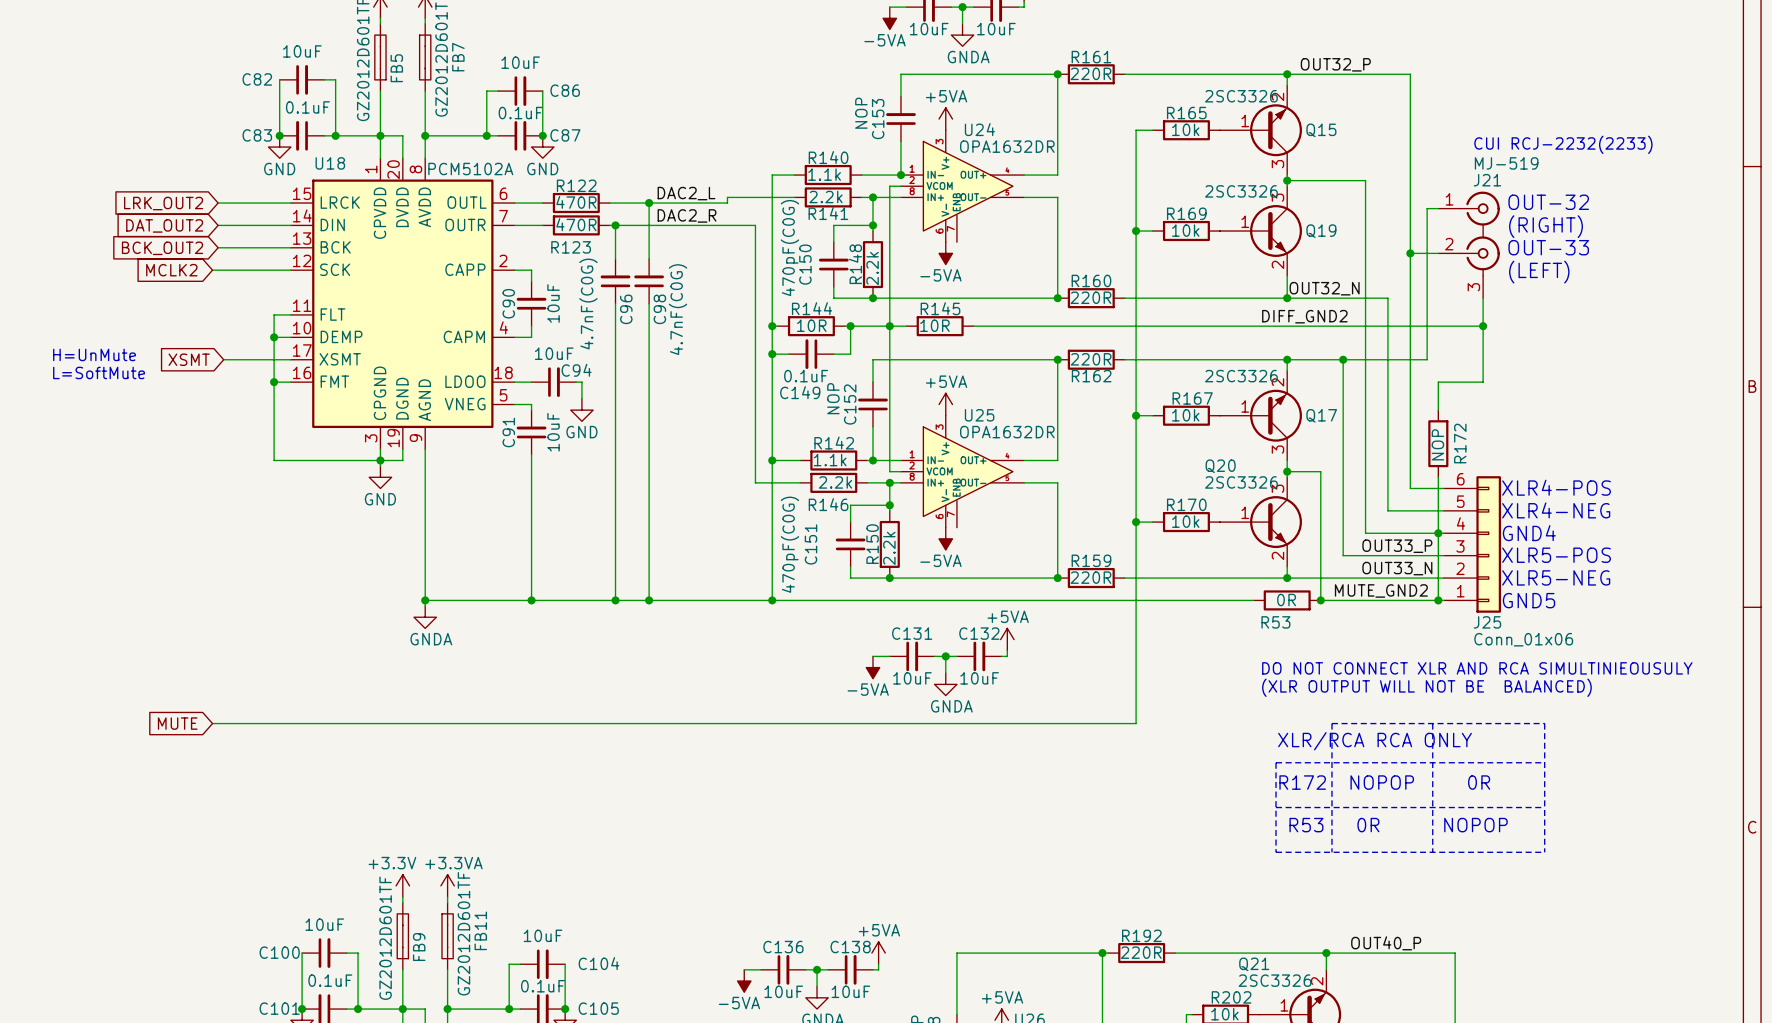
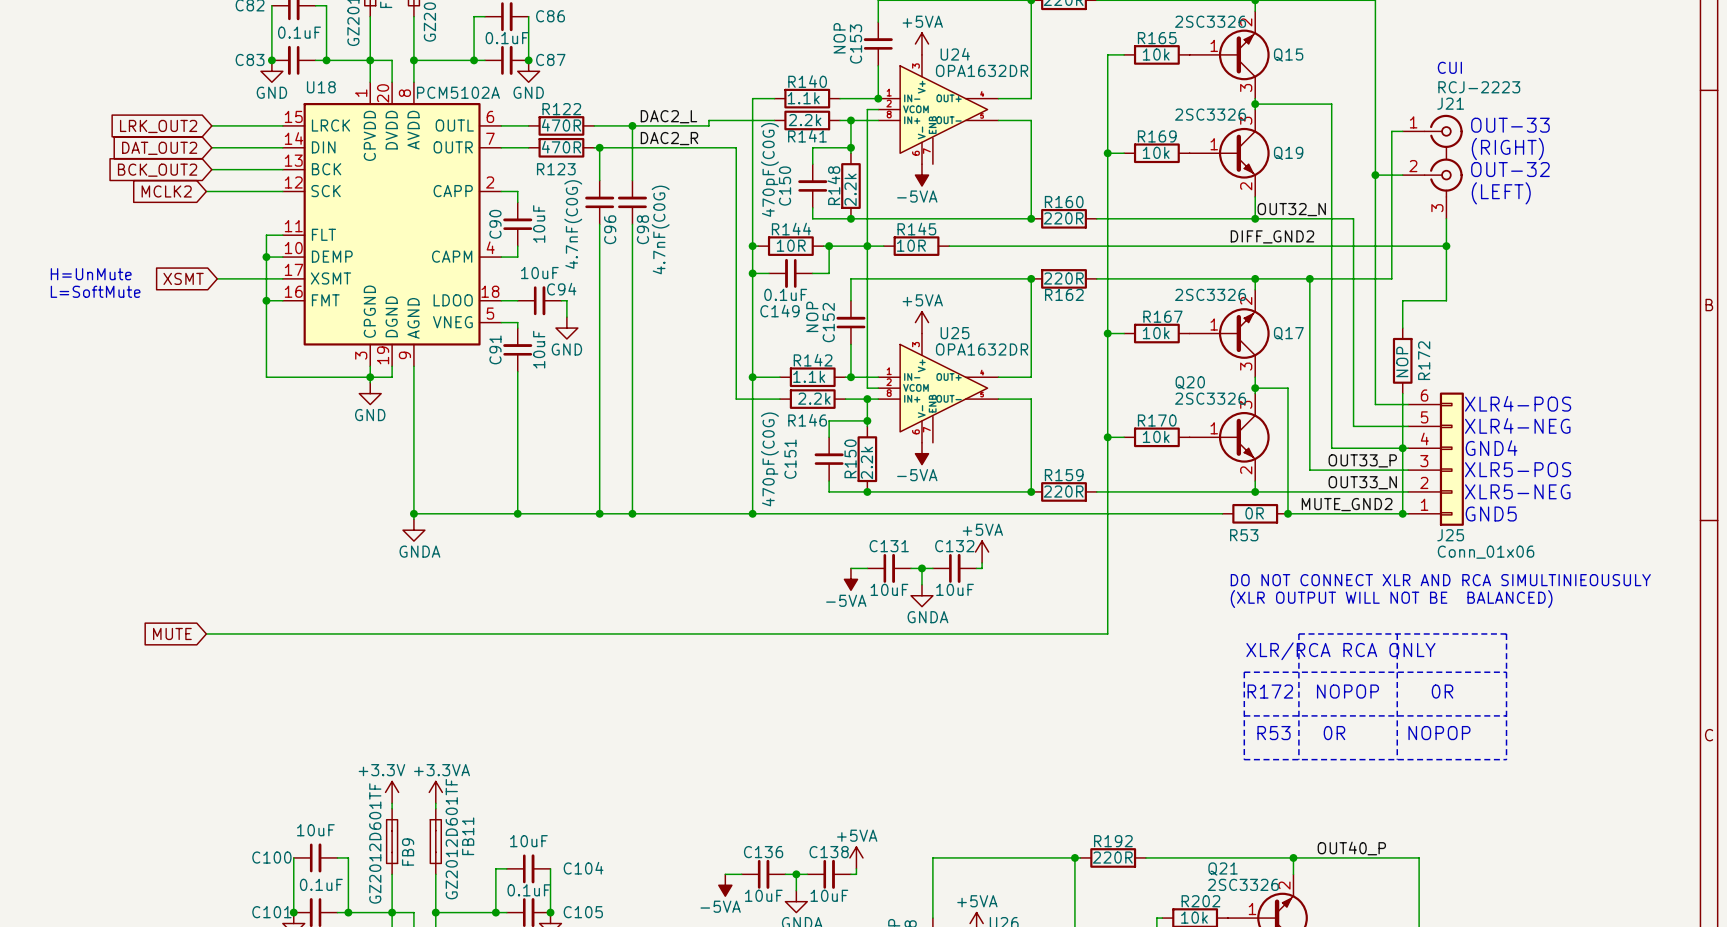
text: CUI RCJ-2232(2233) (1563, 144) -> CUI (1449, 67)
J21 value: MJ-519 (1506, 163) -> RCJ-2223 (1479, 87)
text: OUT-32 (1548, 202) -> OUT-33 (1510, 125)
text: OUT-33 (1548, 247) -> OUT-32 (1510, 169)

